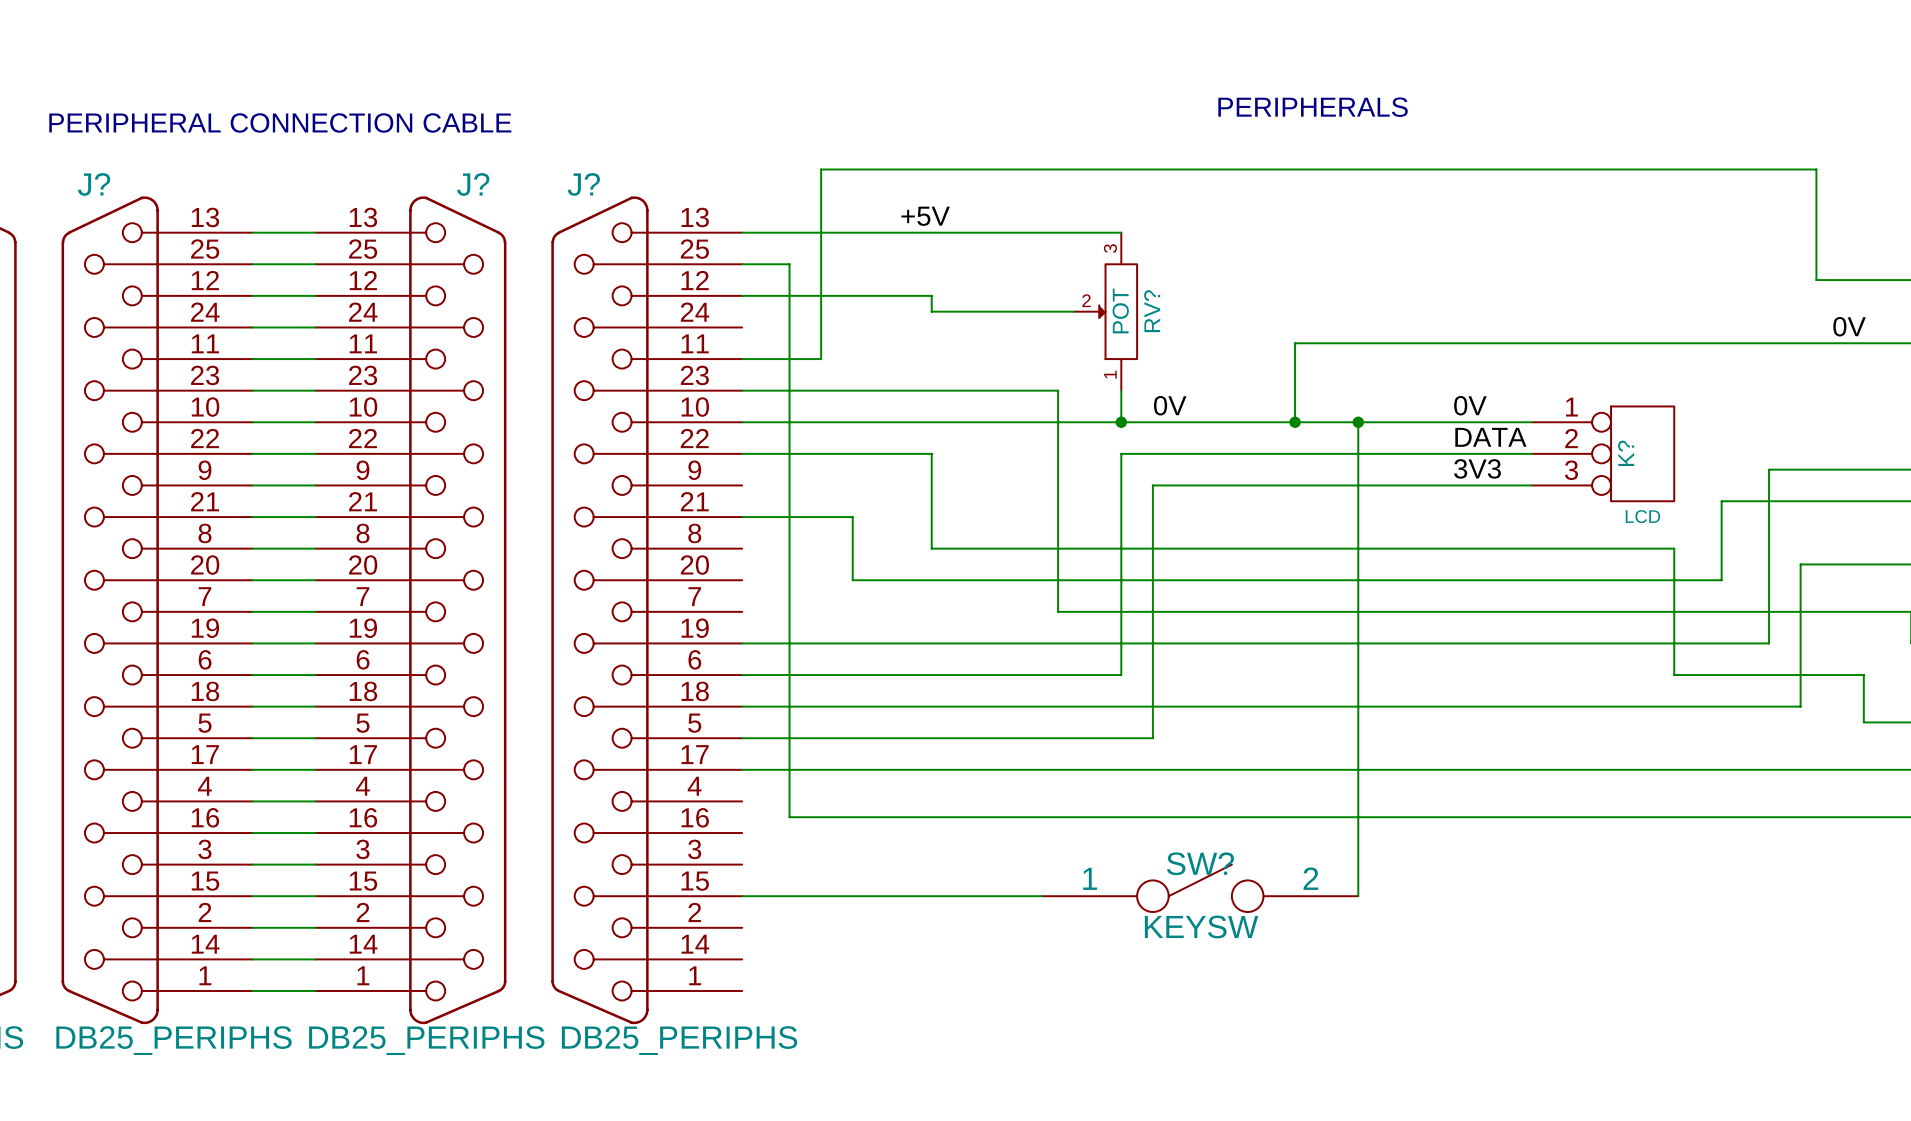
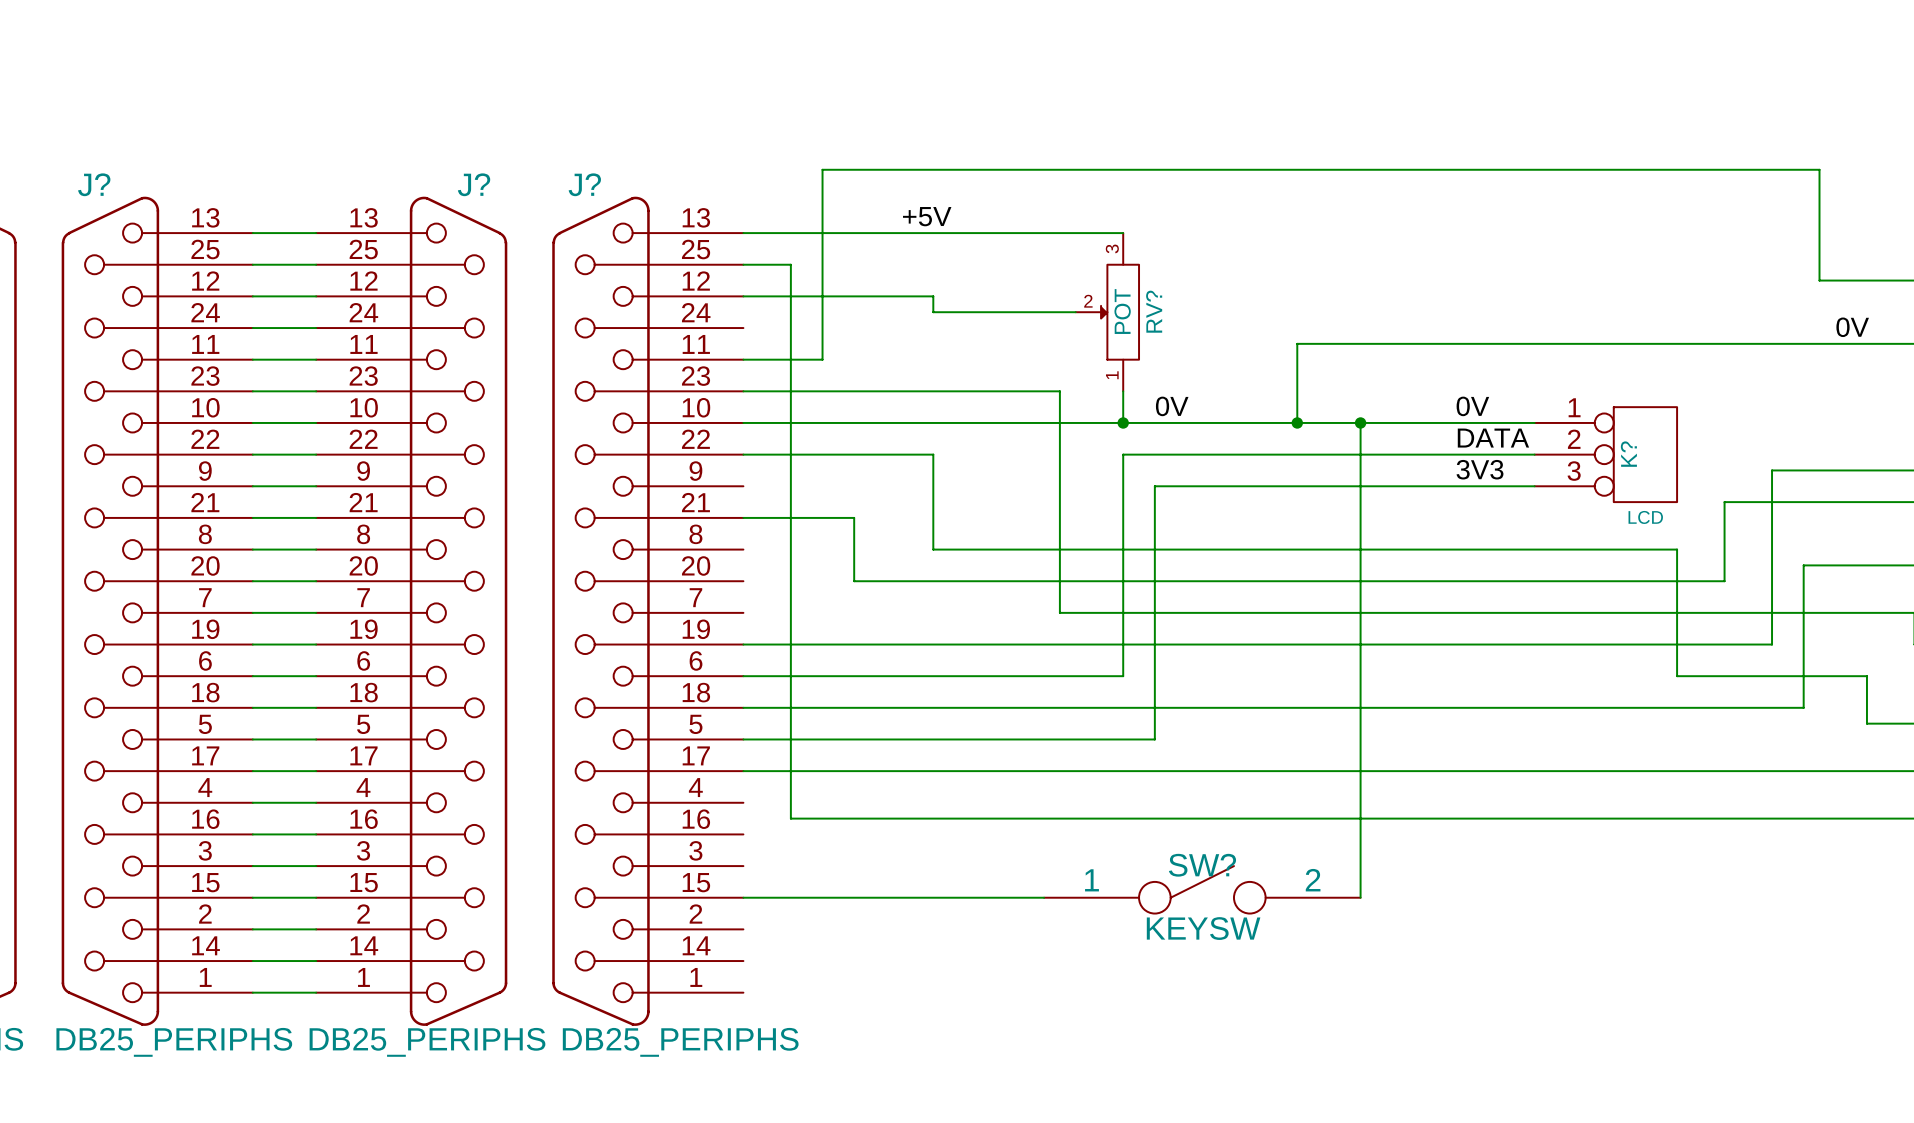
text: PERIPHERALS (1313, 107) -> none
text: PERIPHERAL CONNECTION CABLE (280, 122) -> none

